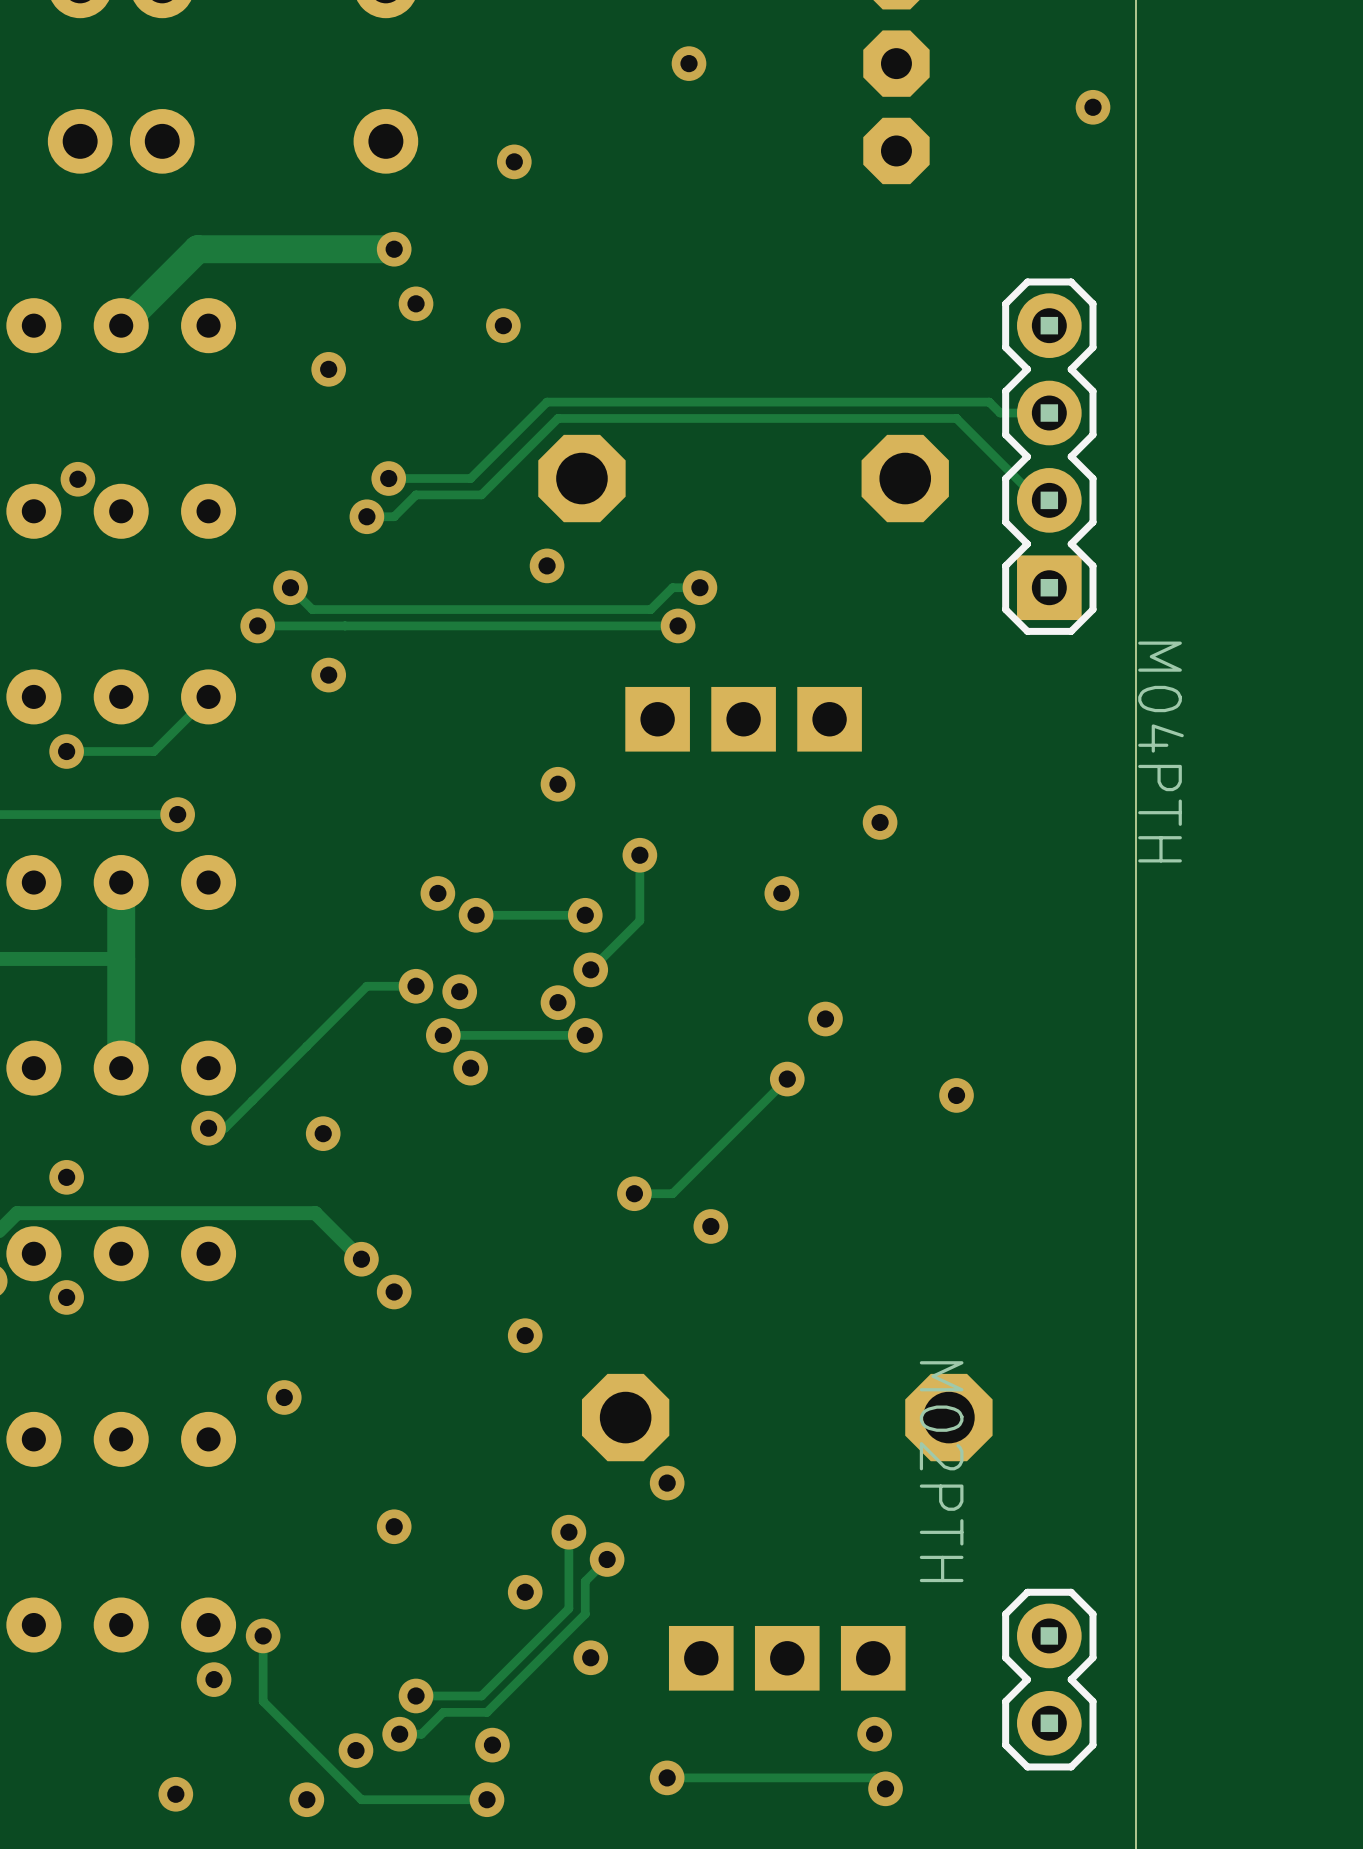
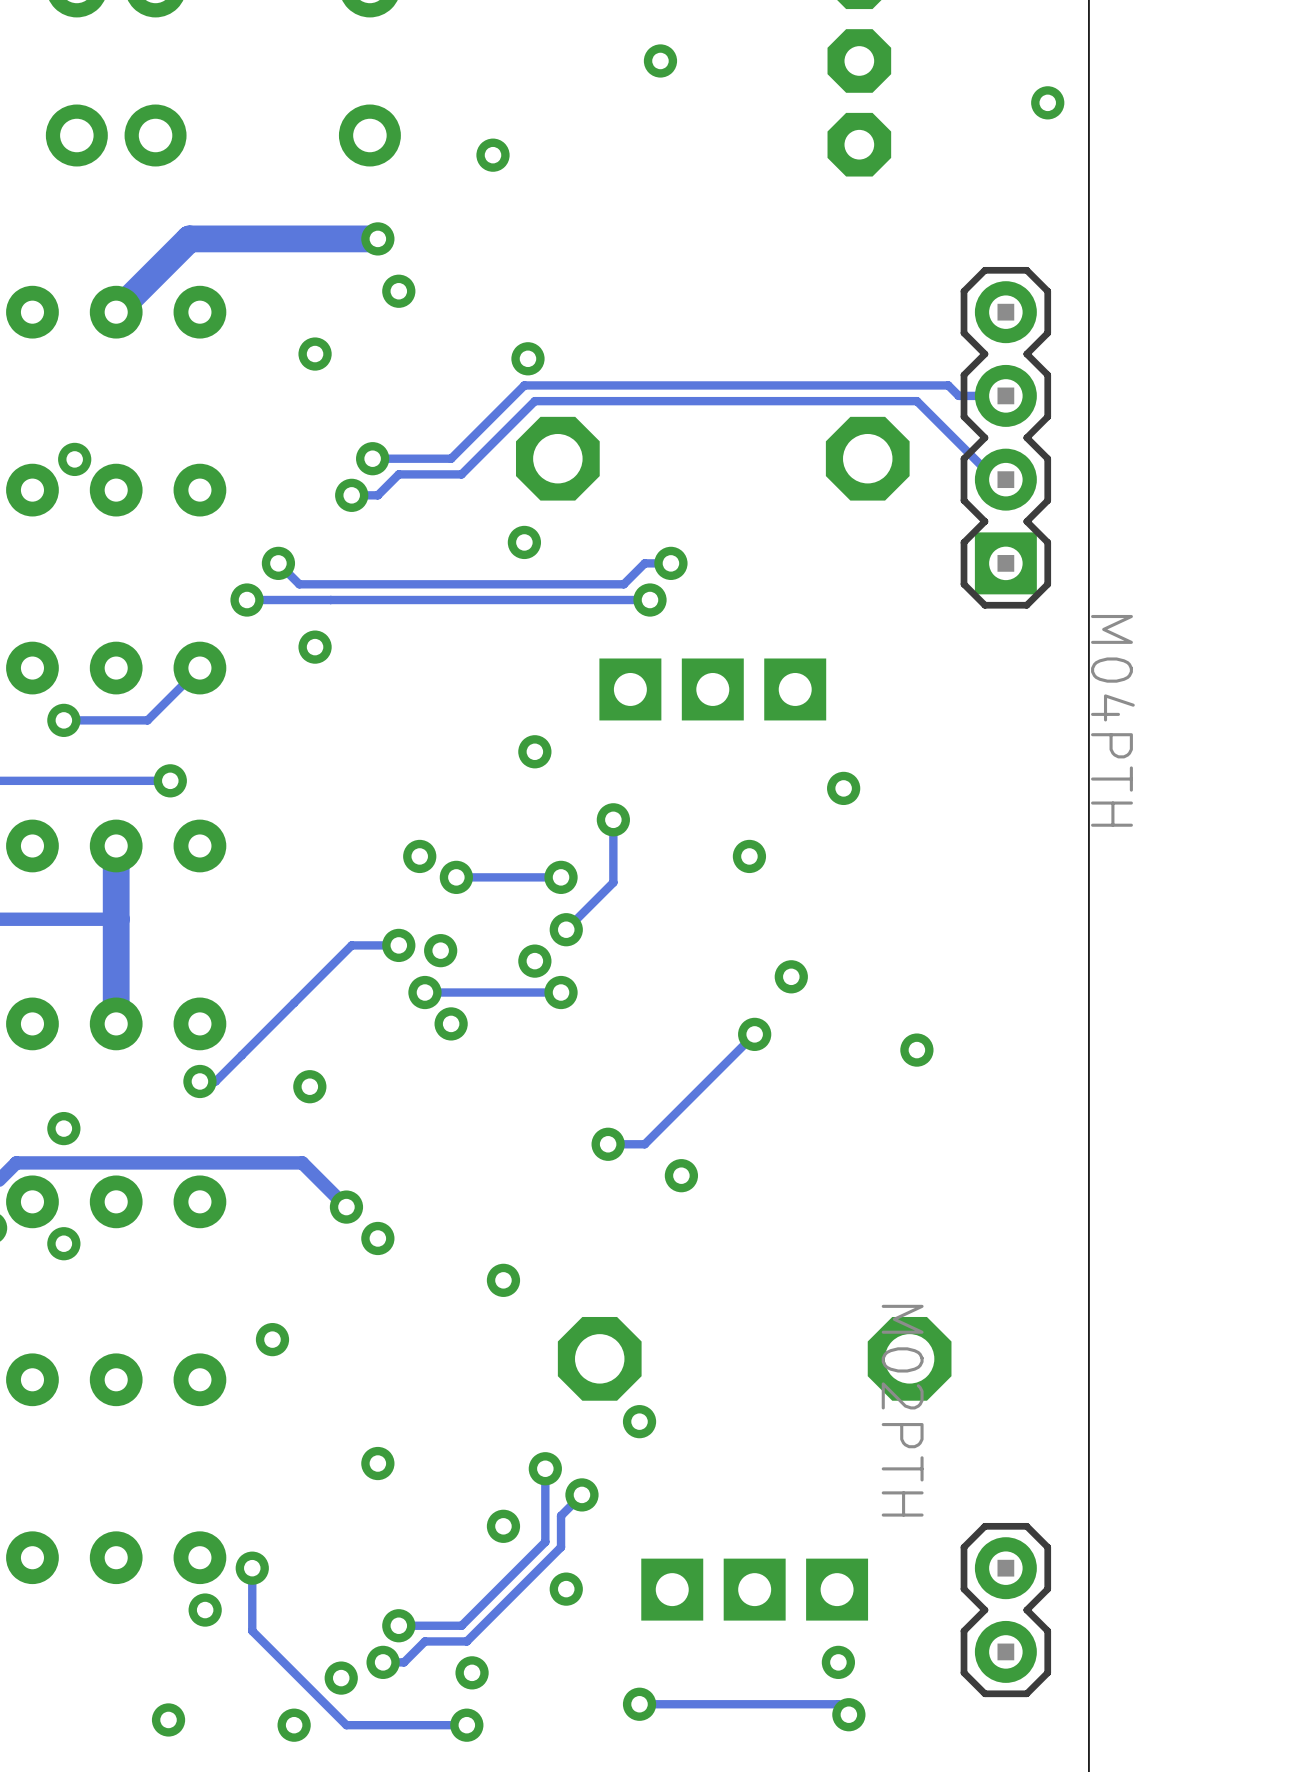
via position: (503, 325) -> (527, 358)

